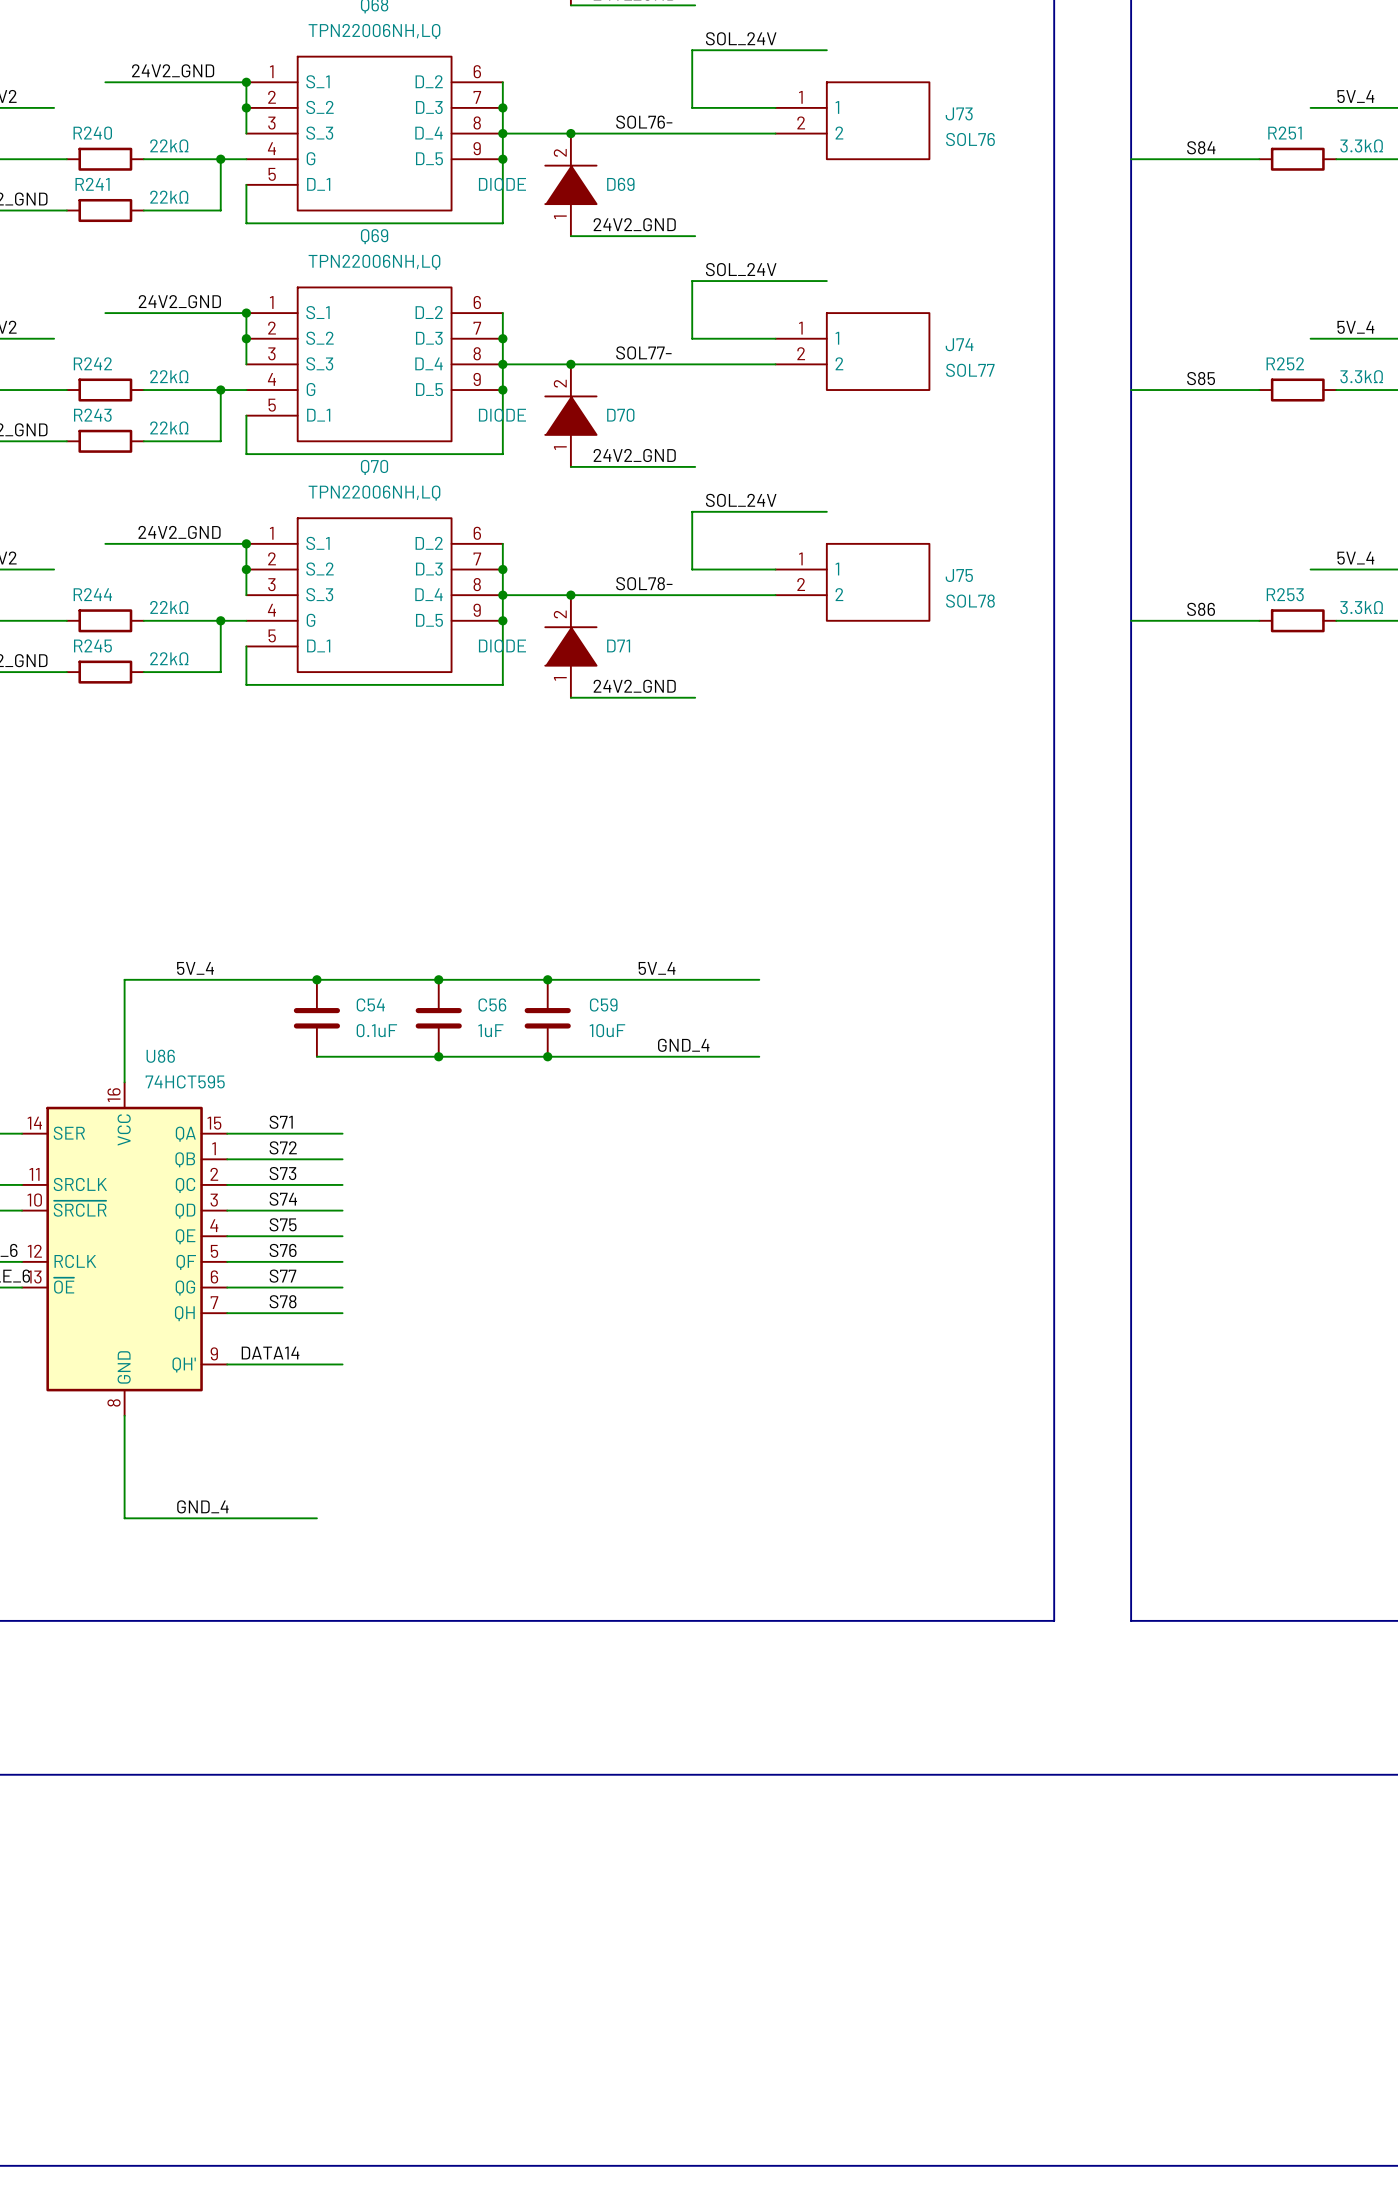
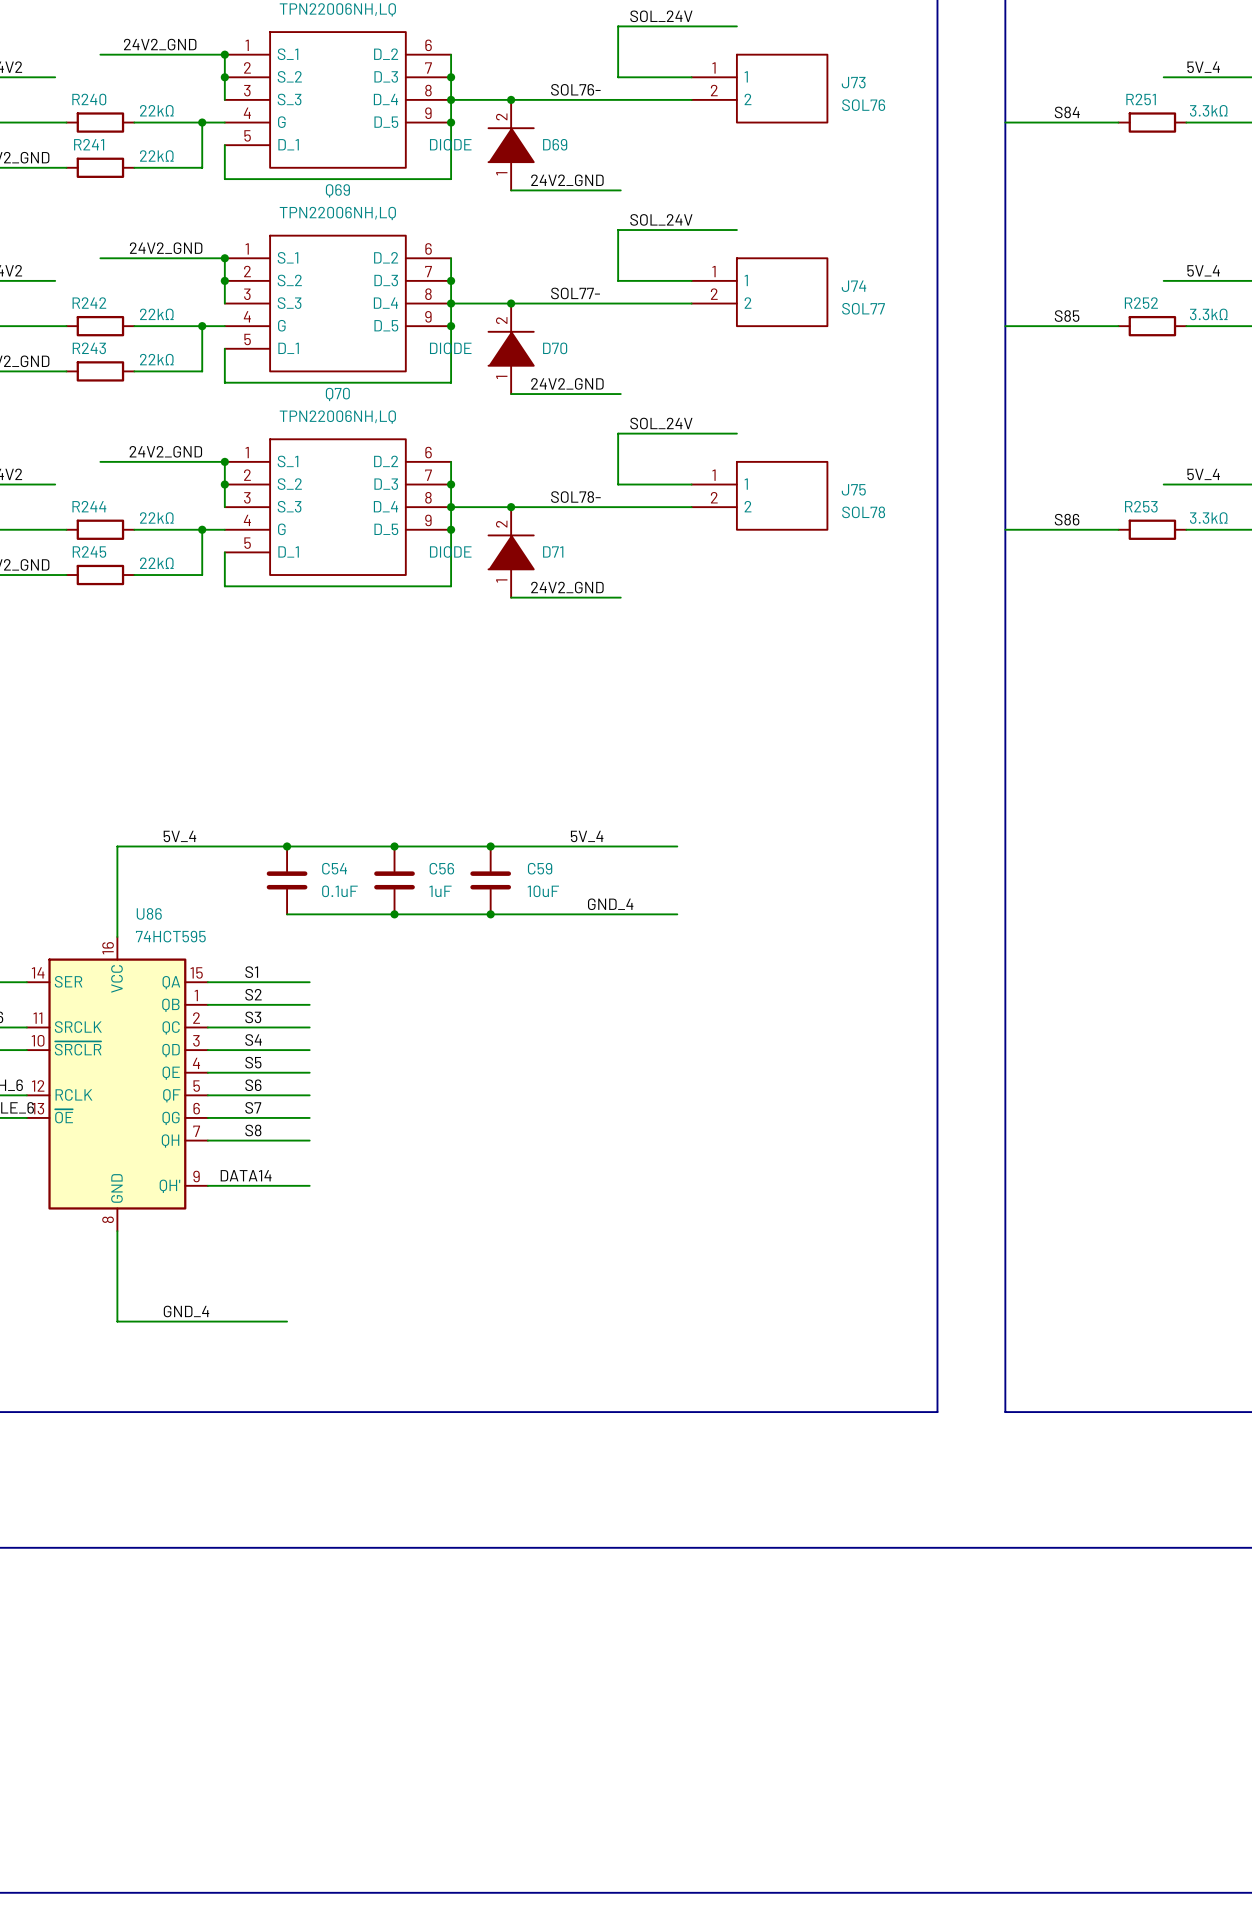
label: S71 (281, 1122) -> S1 (251, 972)
label: S72 (283, 1147) -> S2 (253, 994)
label: S73 (282, 1173) -> S3 (253, 1017)
label: S74 (283, 1199) -> S4 (253, 1040)
label: S75 (283, 1224) -> S5 (253, 1062)
label: S76 (283, 1250) -> S6 (253, 1085)
label: S77 (282, 1276) -> S7 (253, 1107)
label: S78 (283, 1301) -> S8 (253, 1130)

